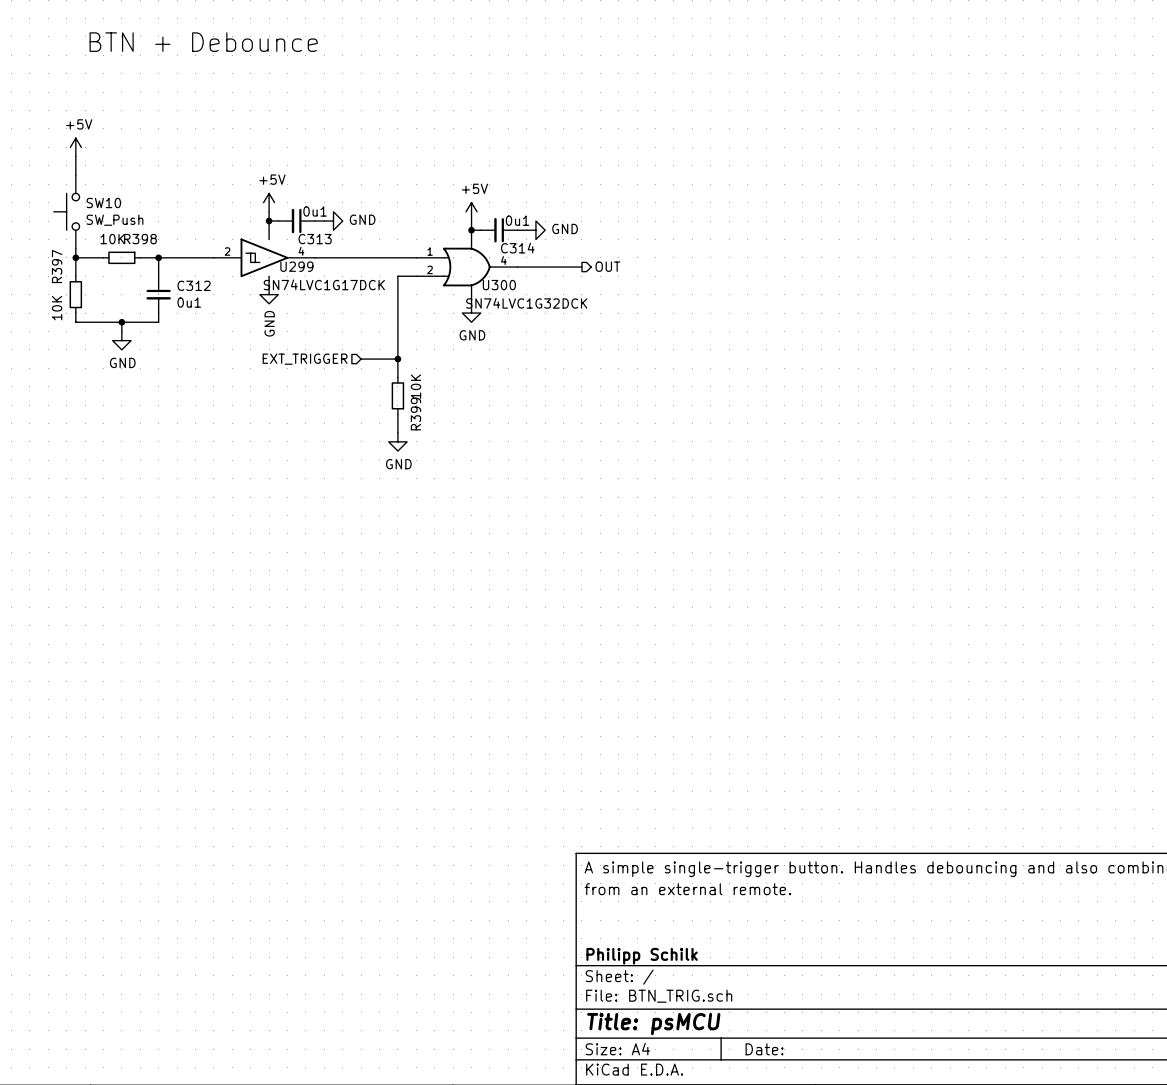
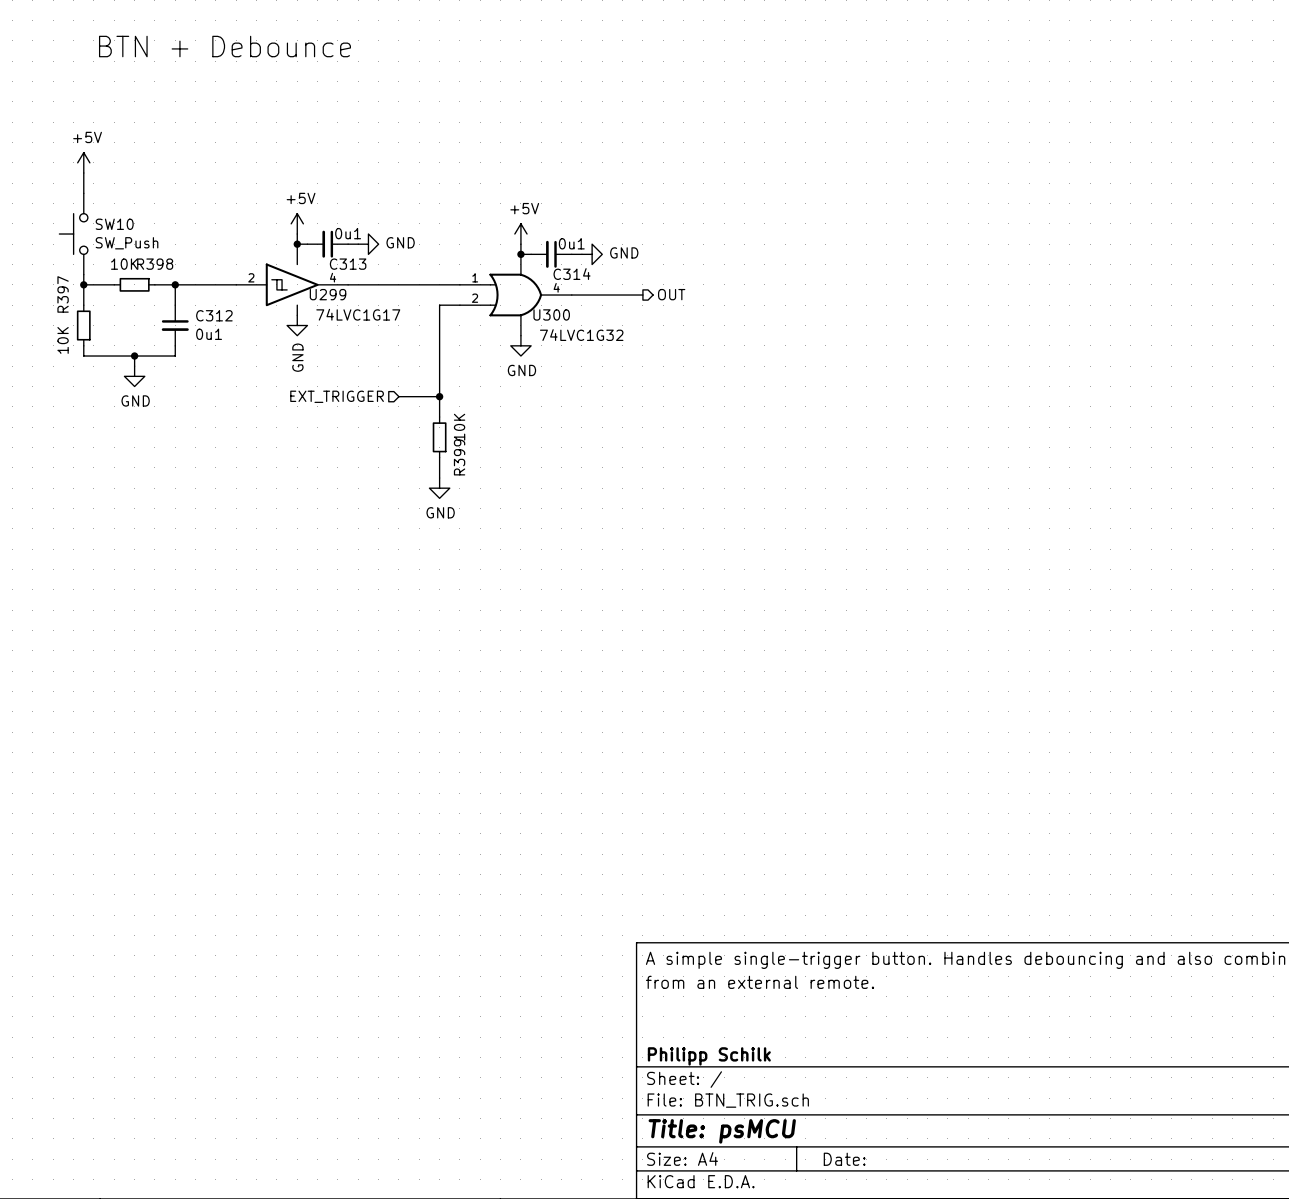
U299 value: SN74LVC1G17DCK (324, 284) -> 74LVC1G17 (358, 314)
U300 value: SN74LVC1G32DCK (526, 303) -> 74LVC1G32 (581, 335)

